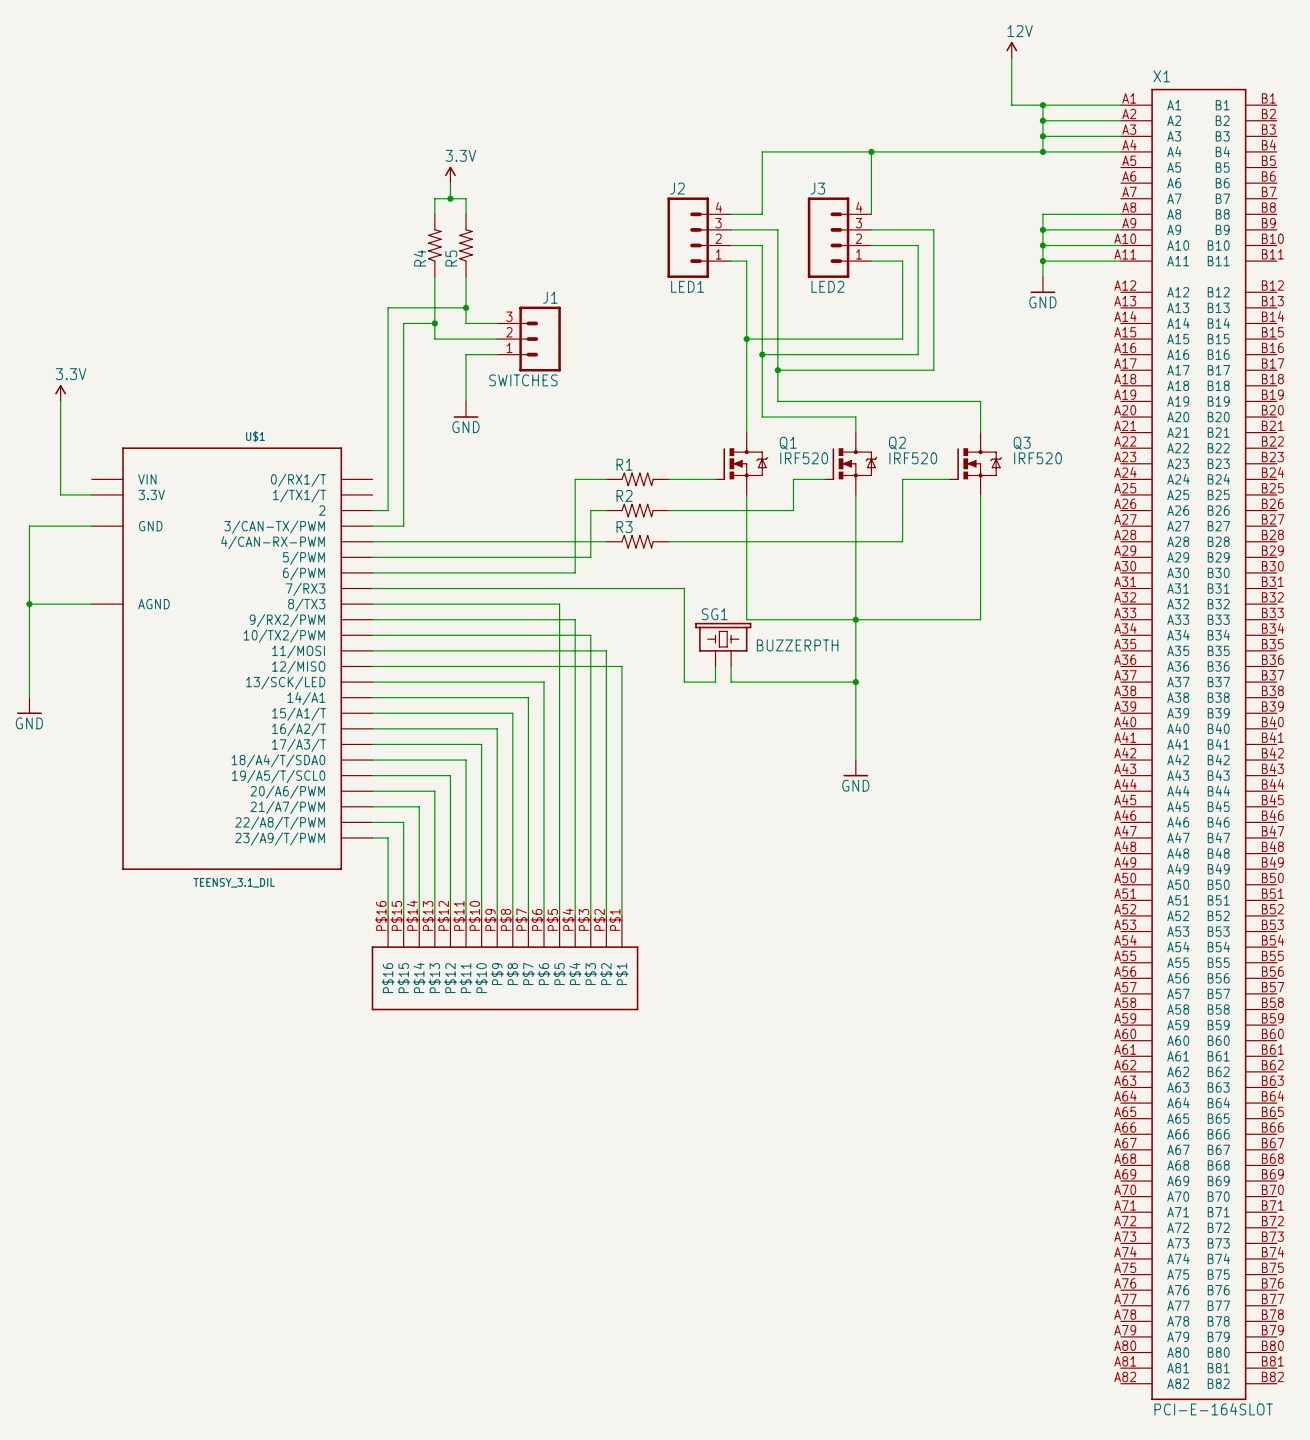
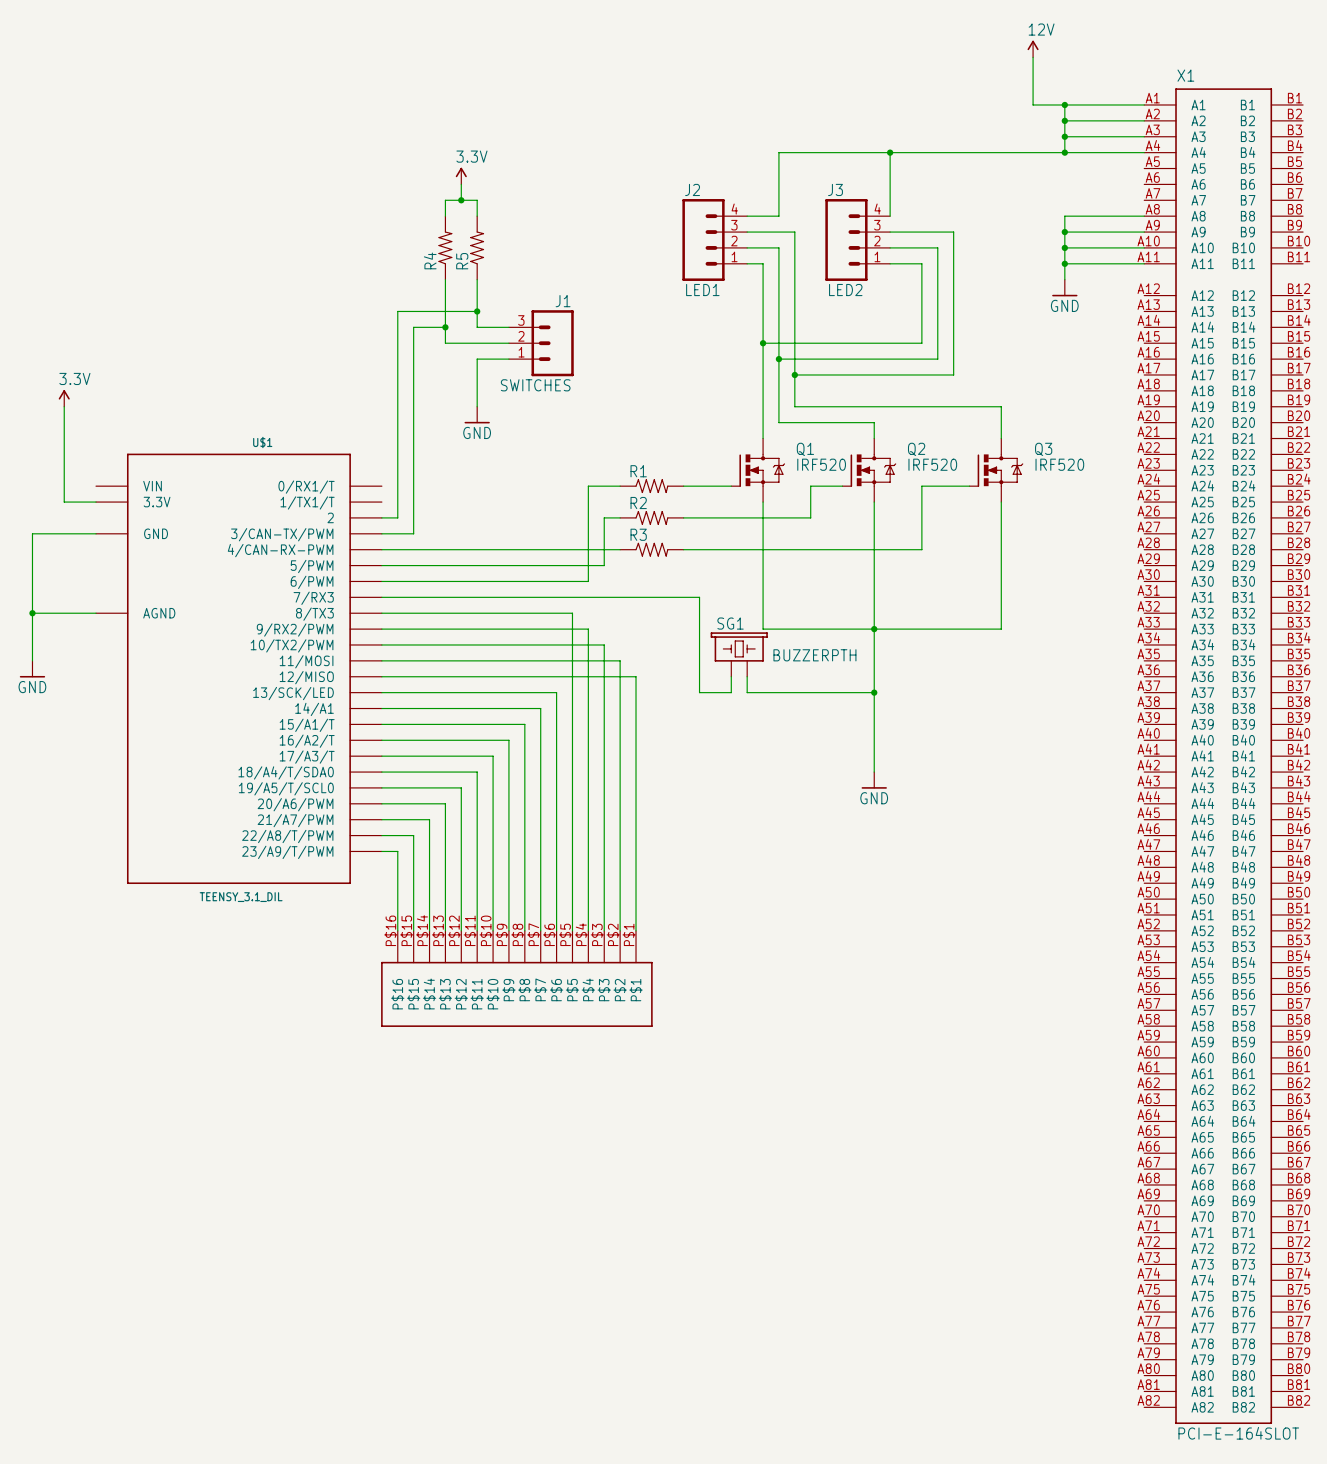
wire: (29, 650) (29, 697) -> none
power symbol position: GND (29, 705) -> GND (32, 669)

